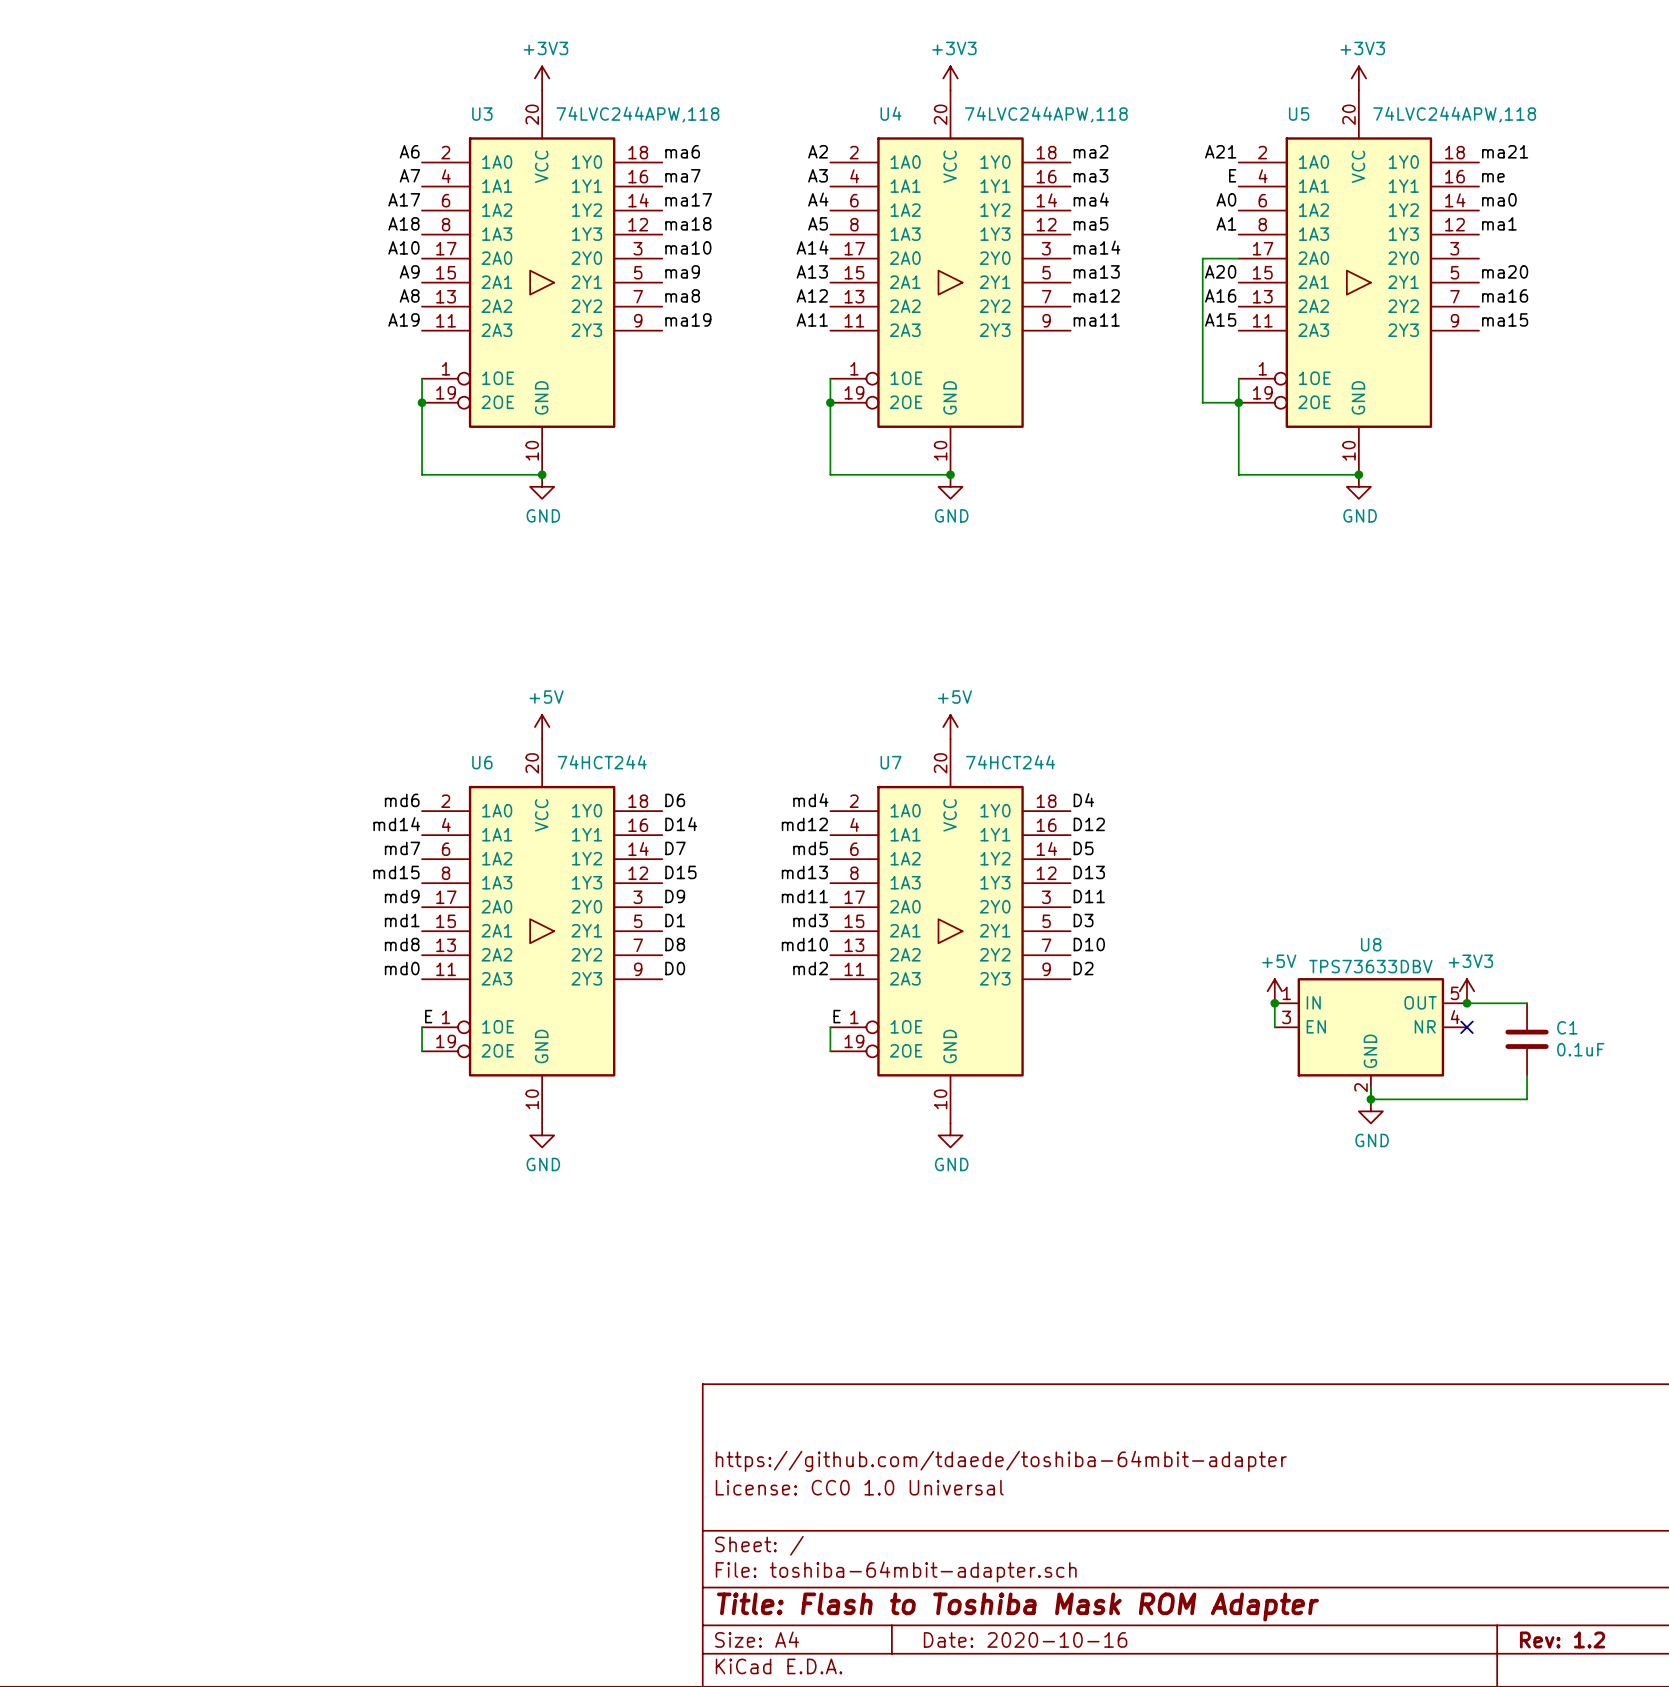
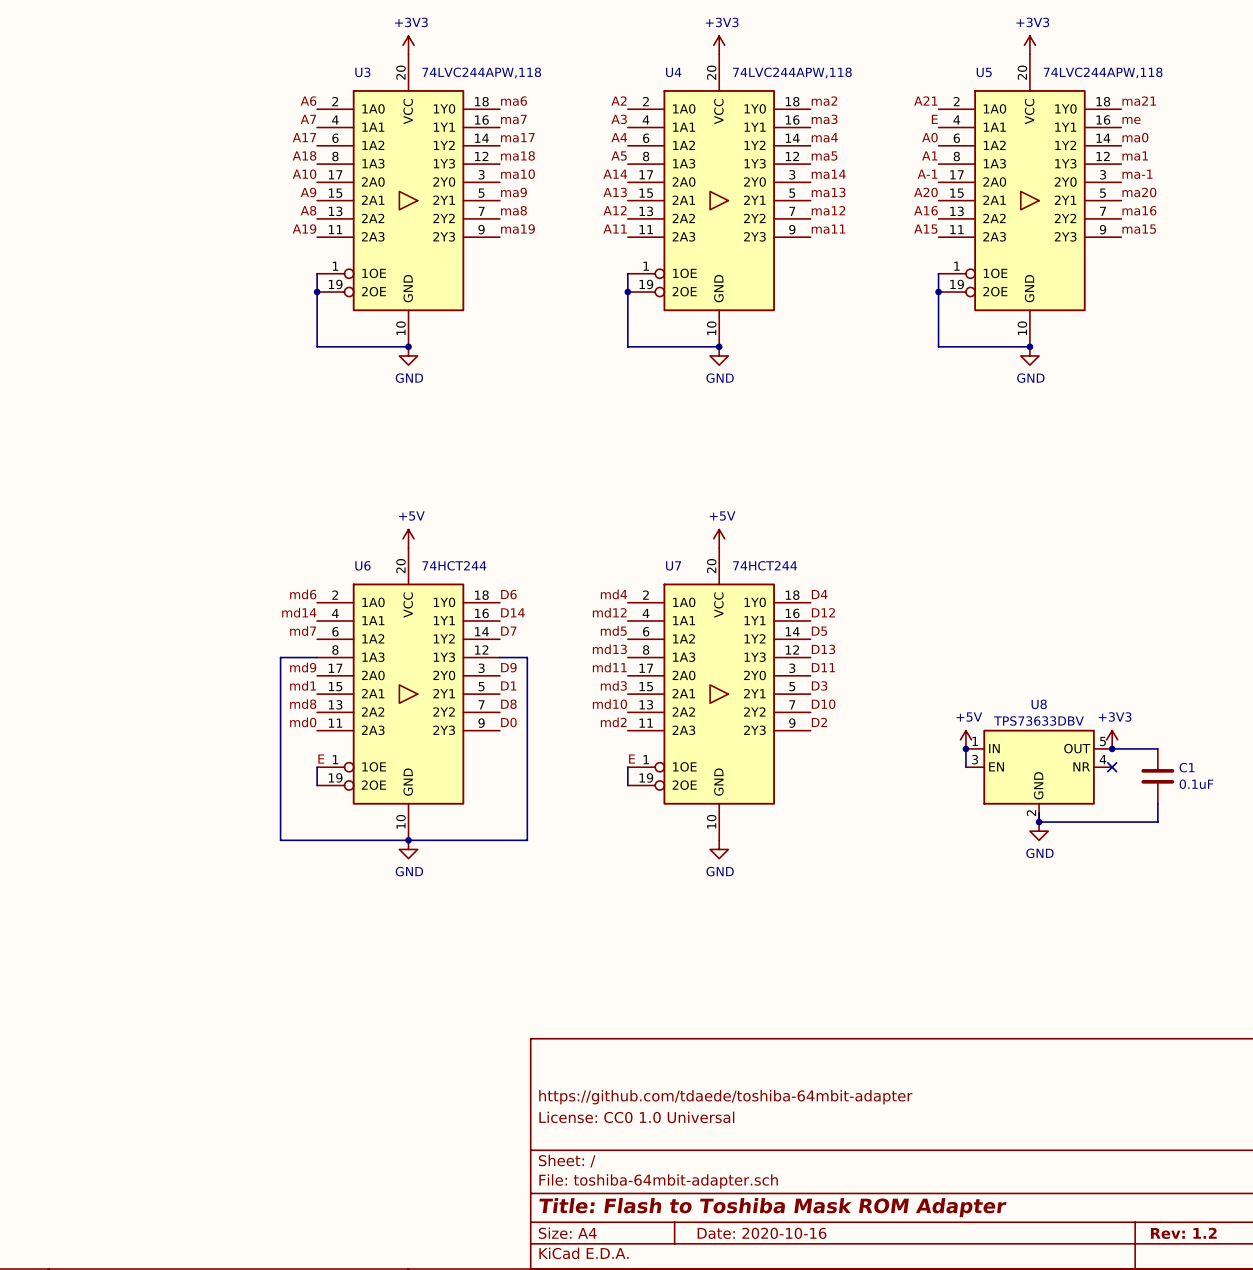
label: none -> A-1 (927, 174)
label: none -> ma-1 (1137, 174)
wire: (1238, 258) (1202, 258) (1202, 402) (1238, 402) -> none
label: md15 (396, 872) -> none
label: D15 (680, 872) -> none
wire: none -> (317, 657) (280, 657) (280, 840) (527, 840) (527, 657) (499, 657)
junction: none -> (408, 840)

